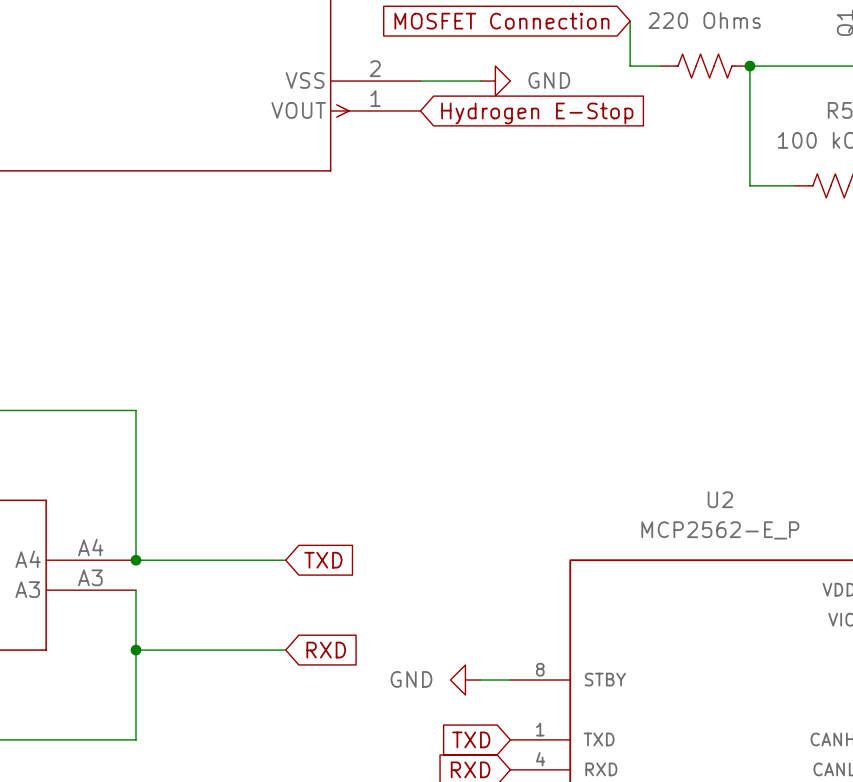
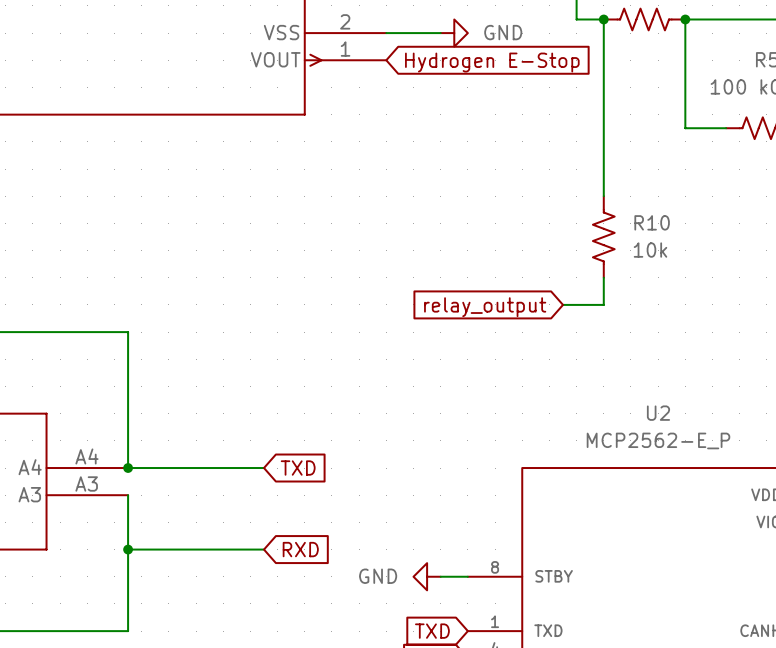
wire: none -> (603, 19) (603, 196)
junction: none -> (603, 19)
R10: none -> 10k (603, 236)
wire: none -> (603, 277) (603, 304) (563, 304)
global label: none -> relay_output (485, 307)

